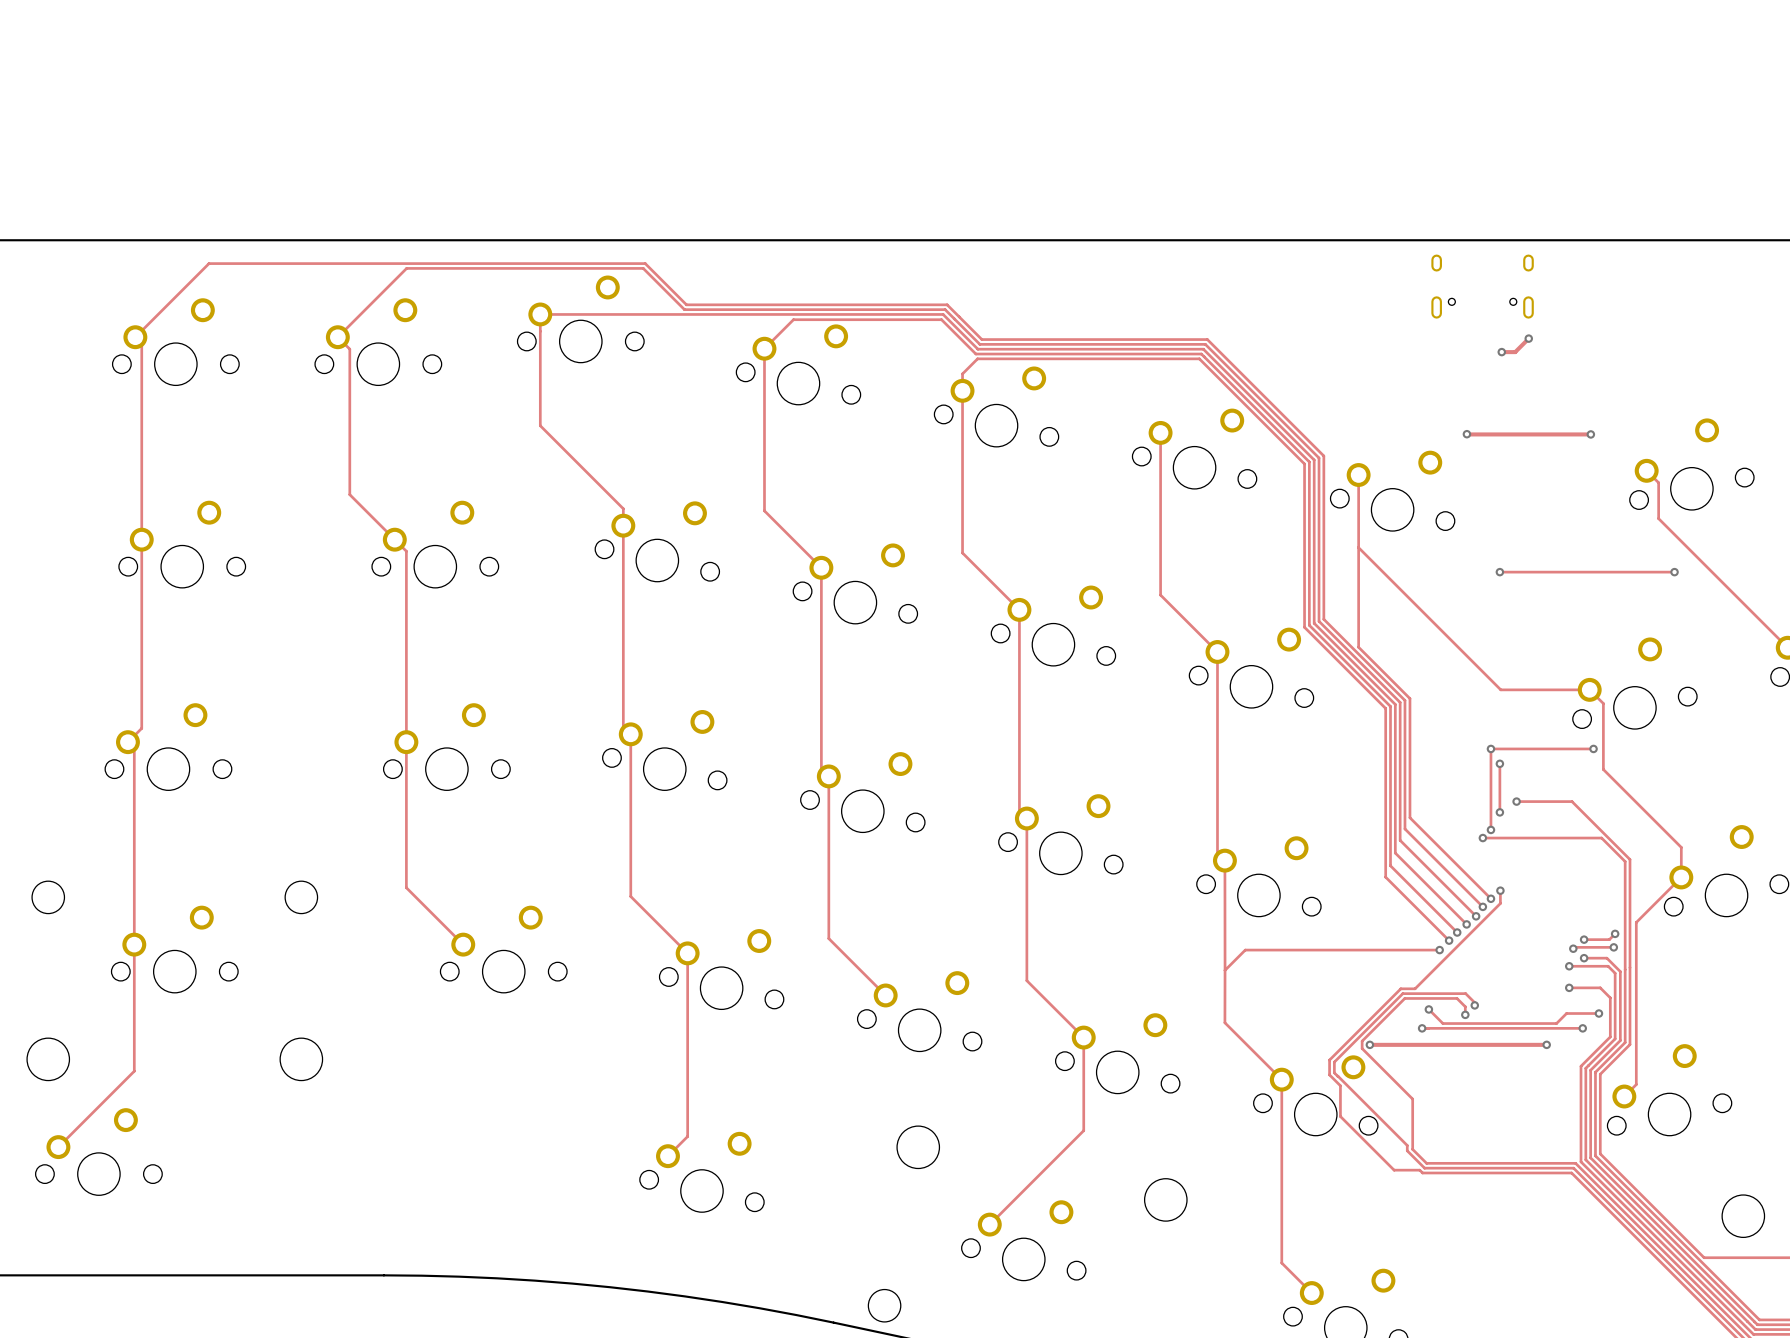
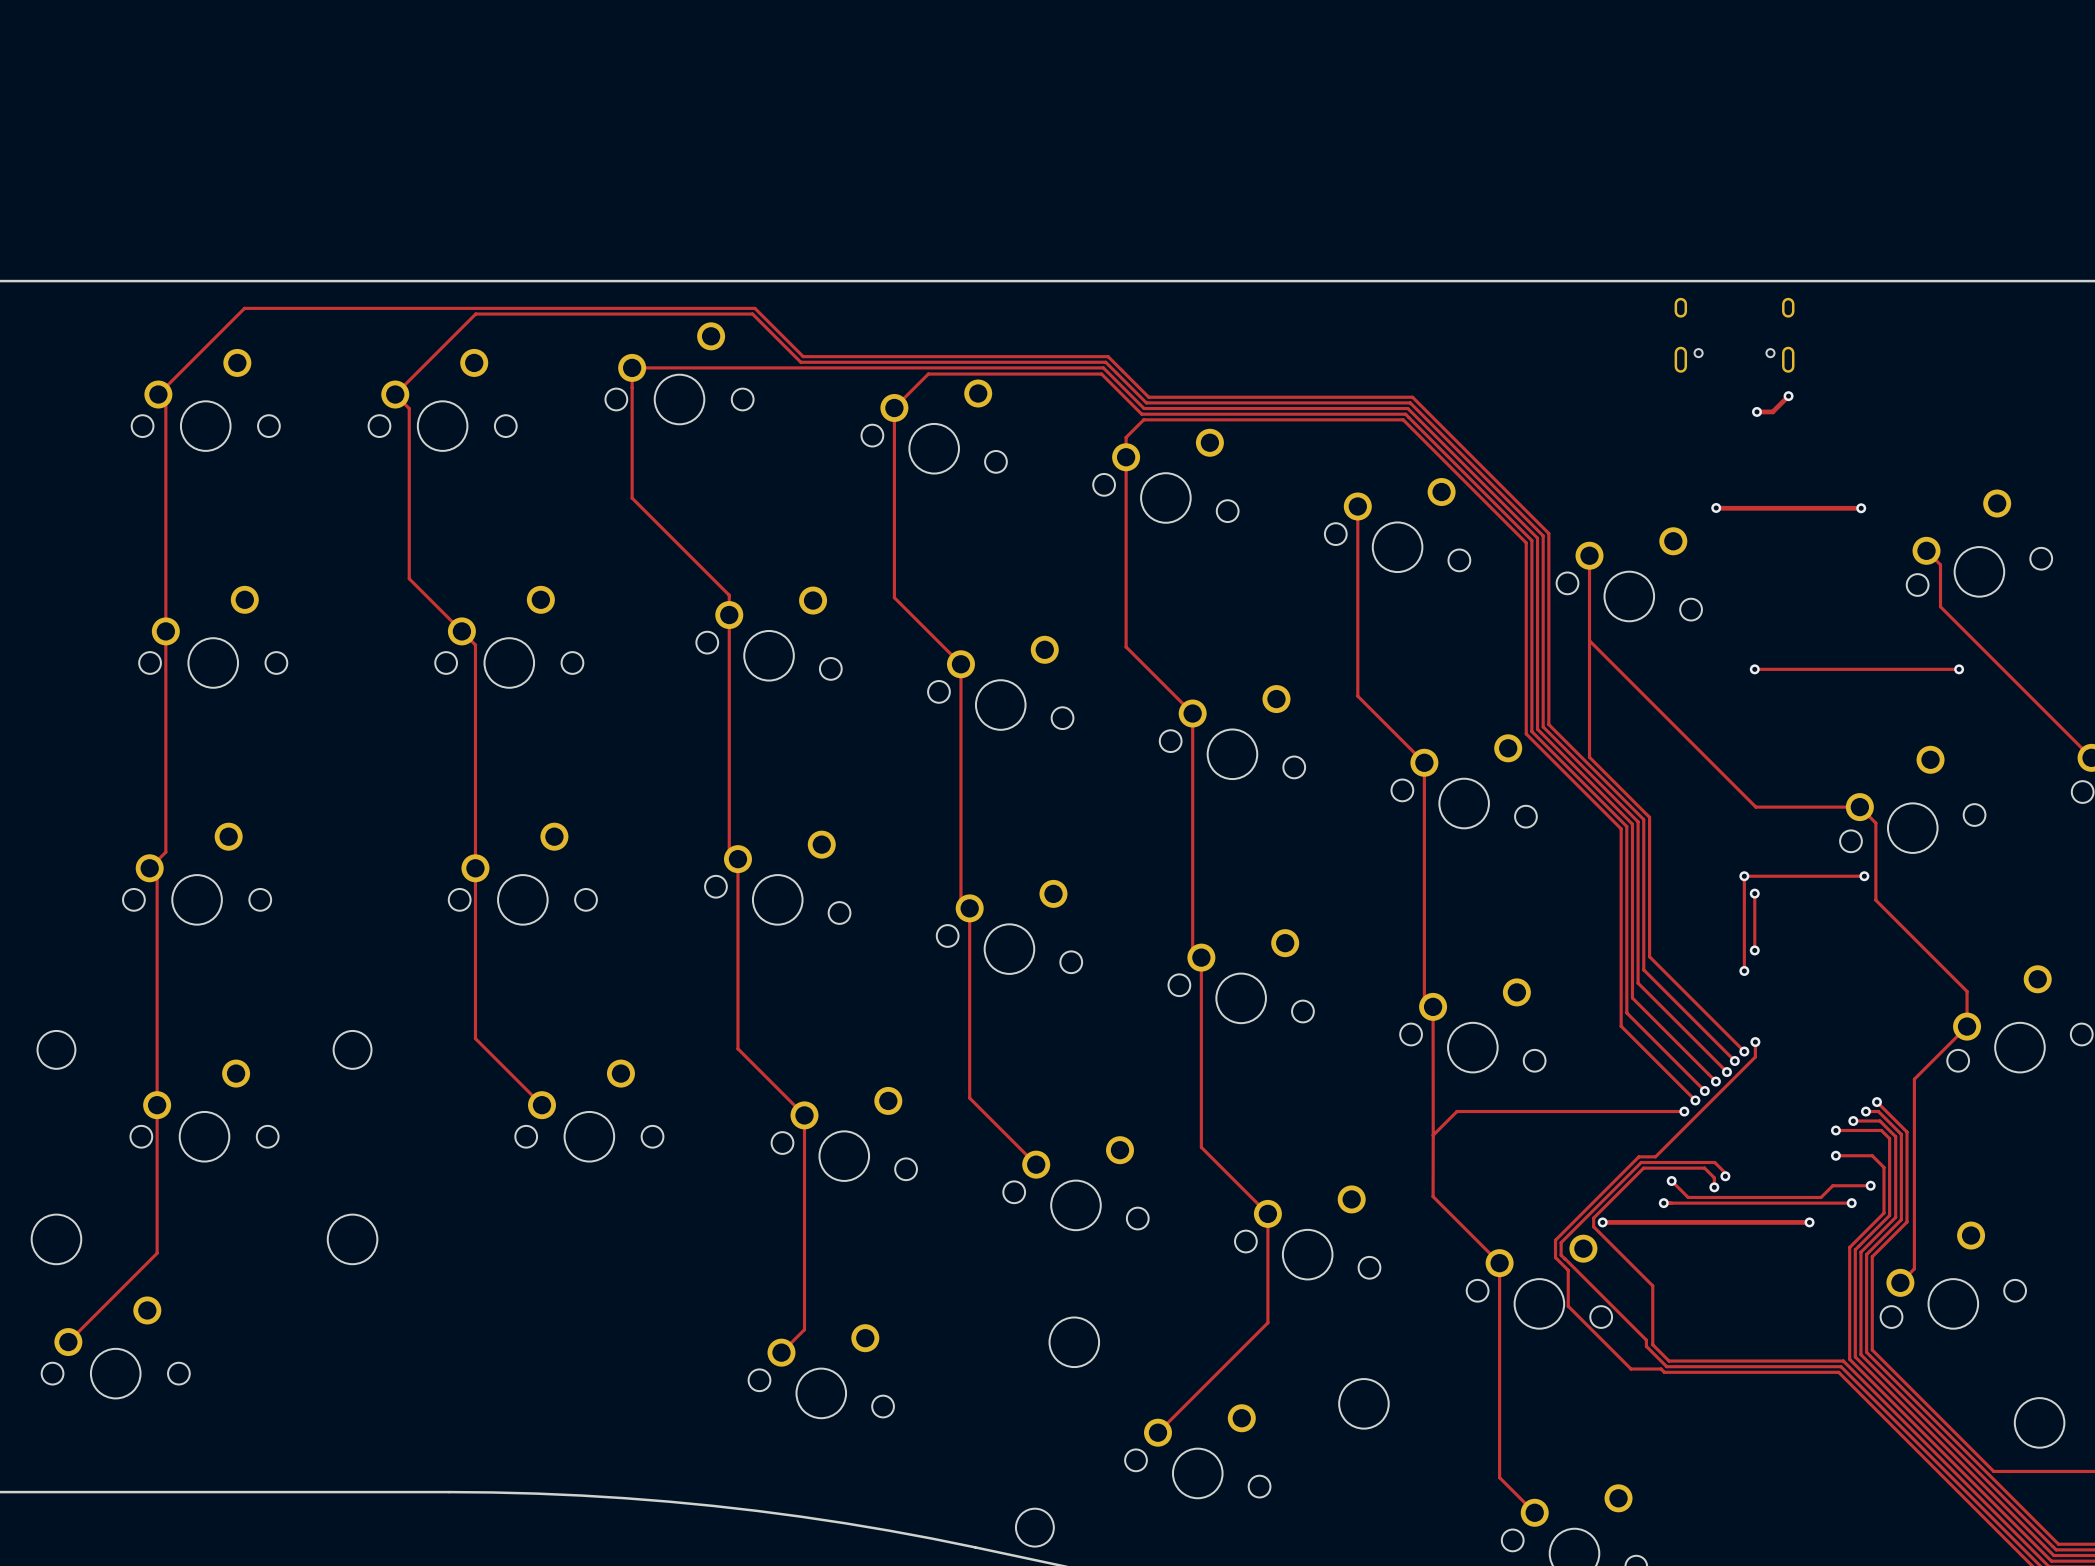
track: (1516, 801) (1572, 801) (1629, 859) (1629, 967) -> (1876, 1102) (1907, 1132)
via: (1516, 801) -> none
track: (1482, 838) (1601, 838) (1625, 861) (1625, 969) -> (1865, 1111) (1878, 1111) (1901, 1134)
via: (1482, 838) -> none
track: (1615, 933) (1609, 939) (1584, 939) -> none
via: (1615, 933) -> none
via: (1584, 939) -> none
via: none -> (1876, 1102)
track: (1613, 947) (1573, 948) -> none
via: (1613, 947) -> none
via: (1573, 948) -> none
via: none -> (1865, 1111)

